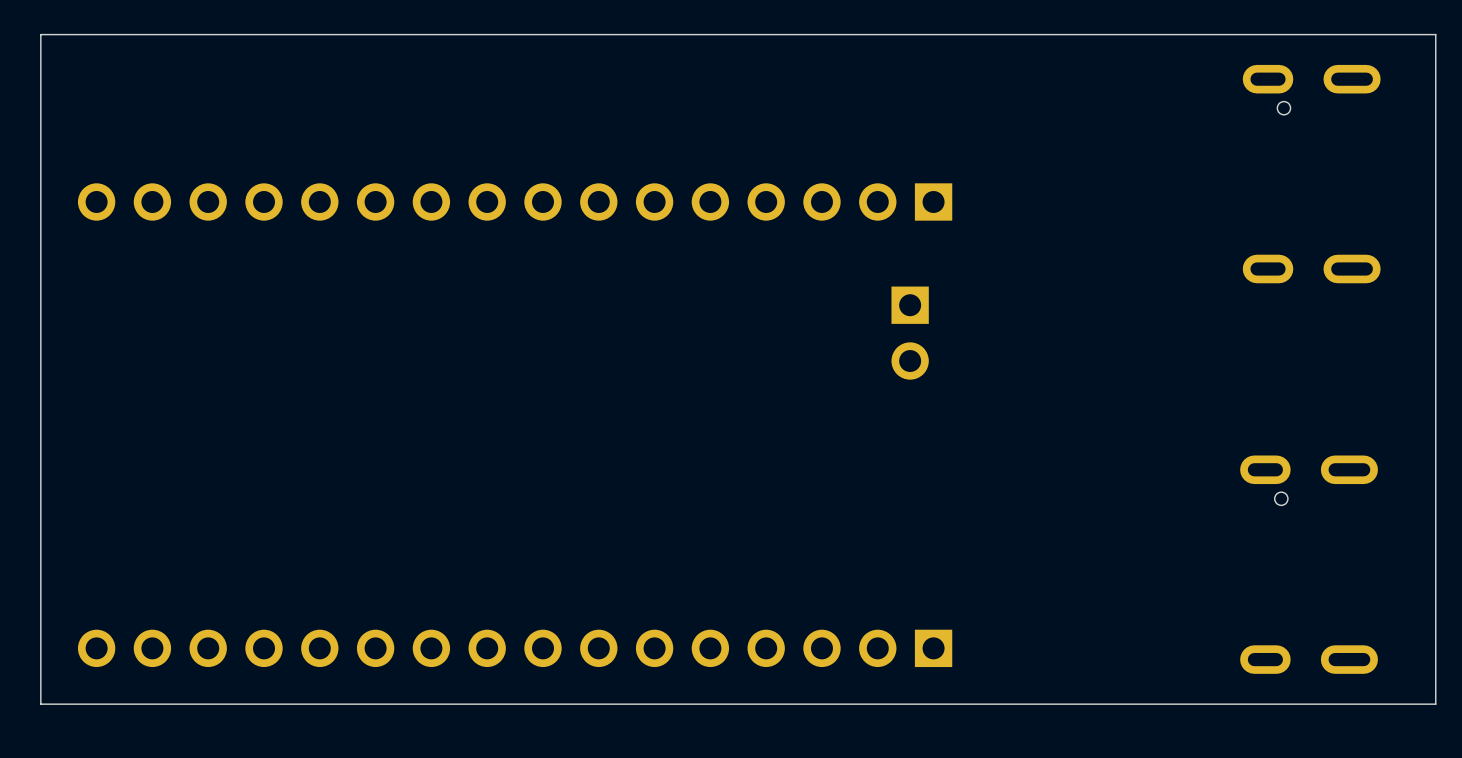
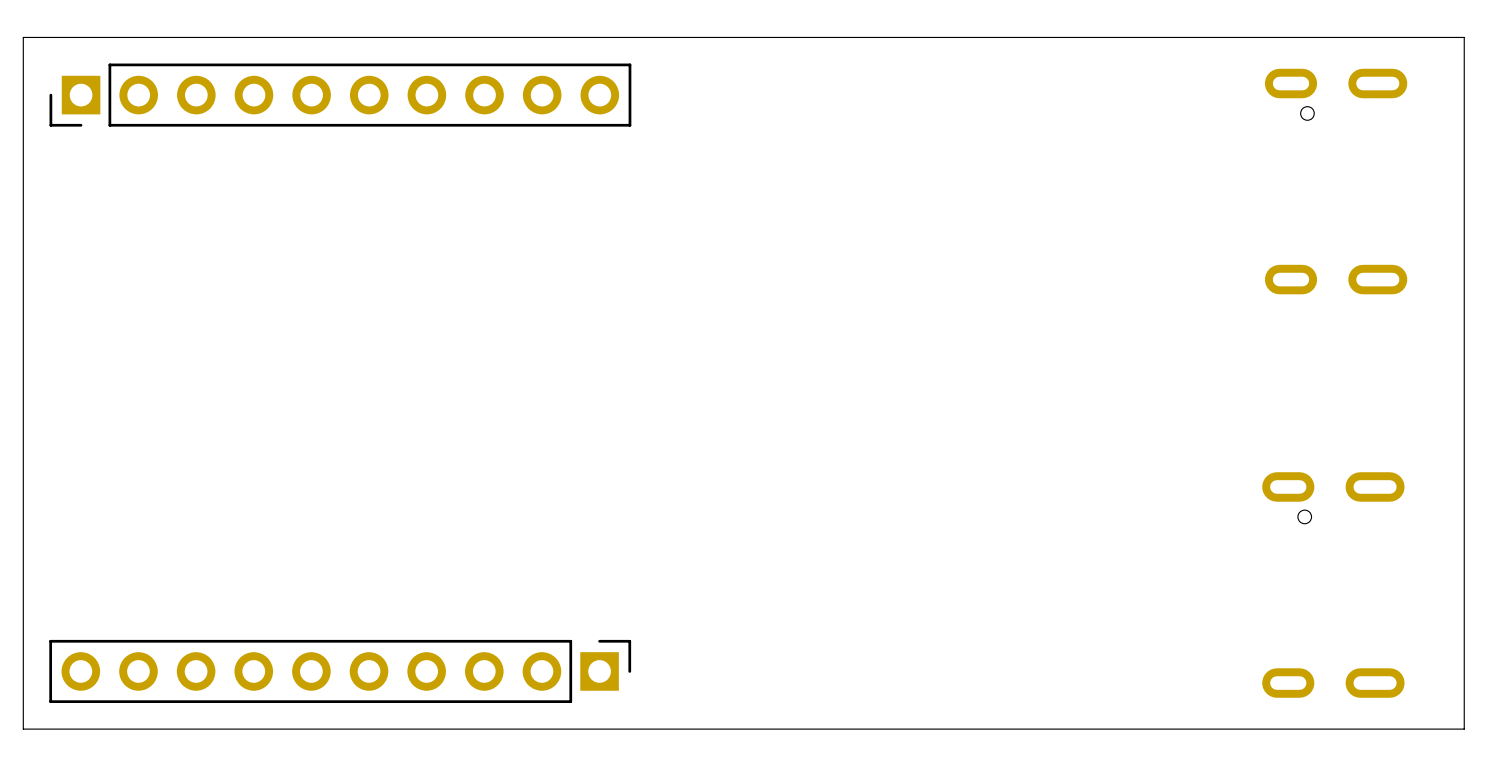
part: none -> (340, 95)
part: (515, 201) -> none
part: (910, 333) -> none
part: none -> (340, 671)
part: (515, 648) -> none

